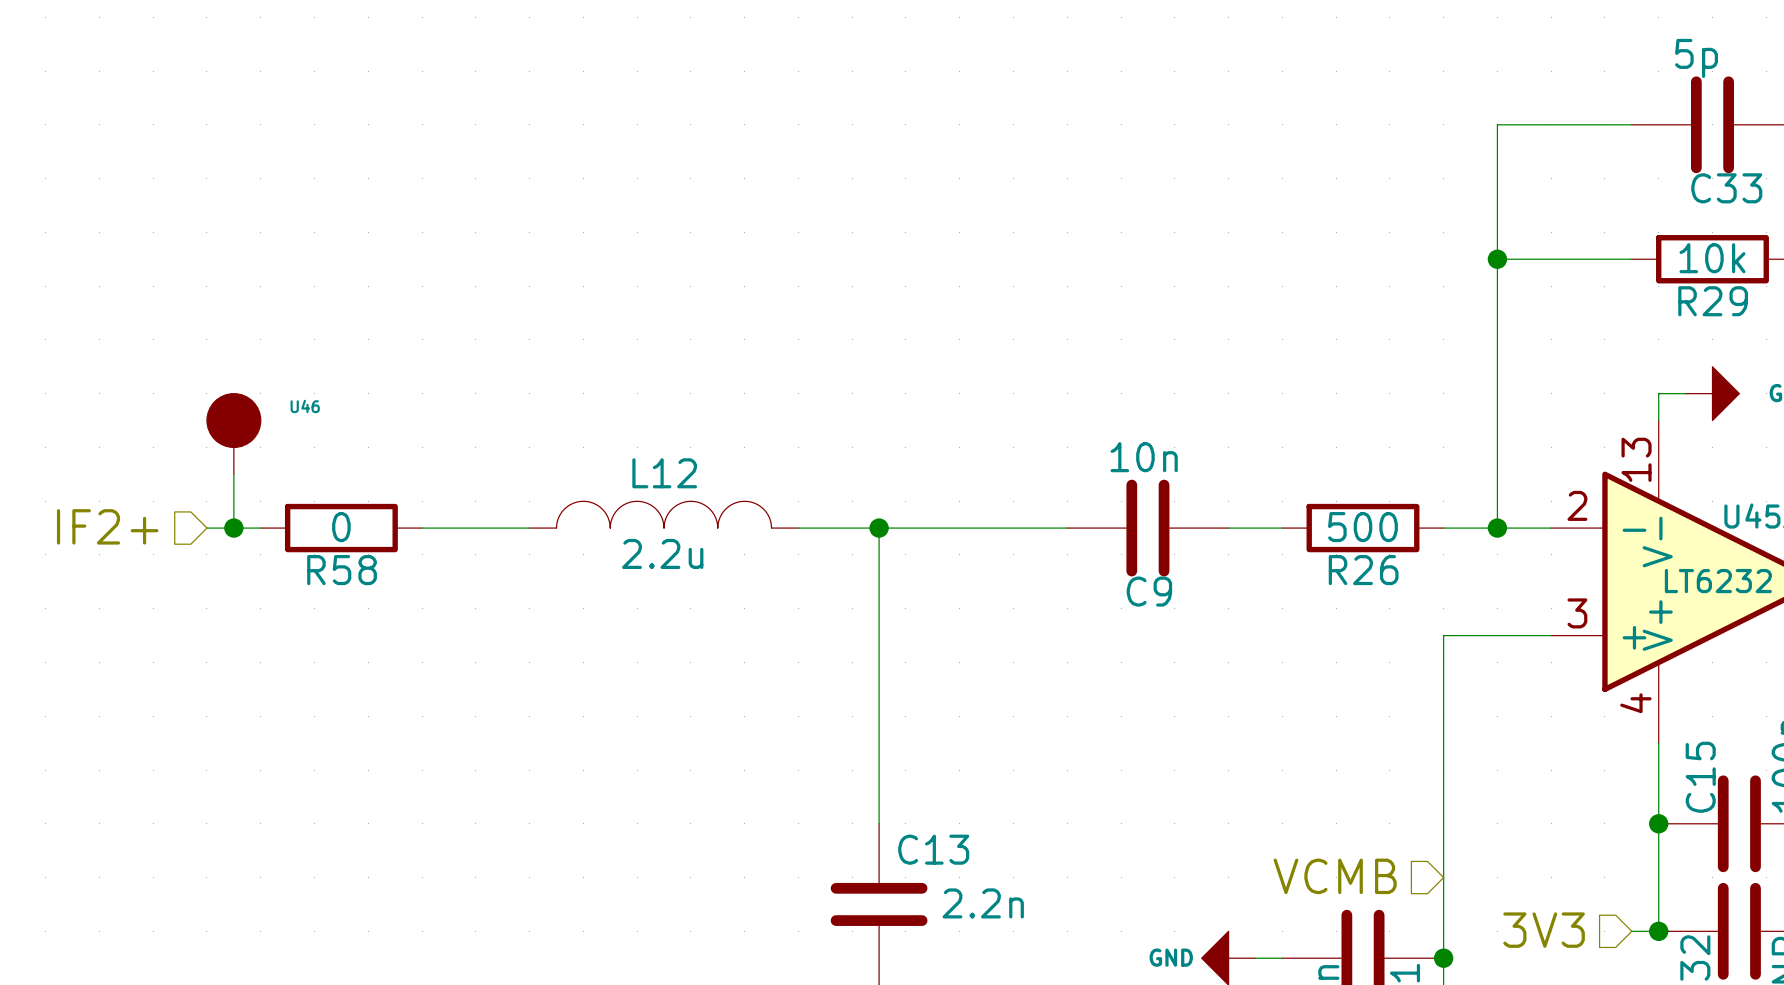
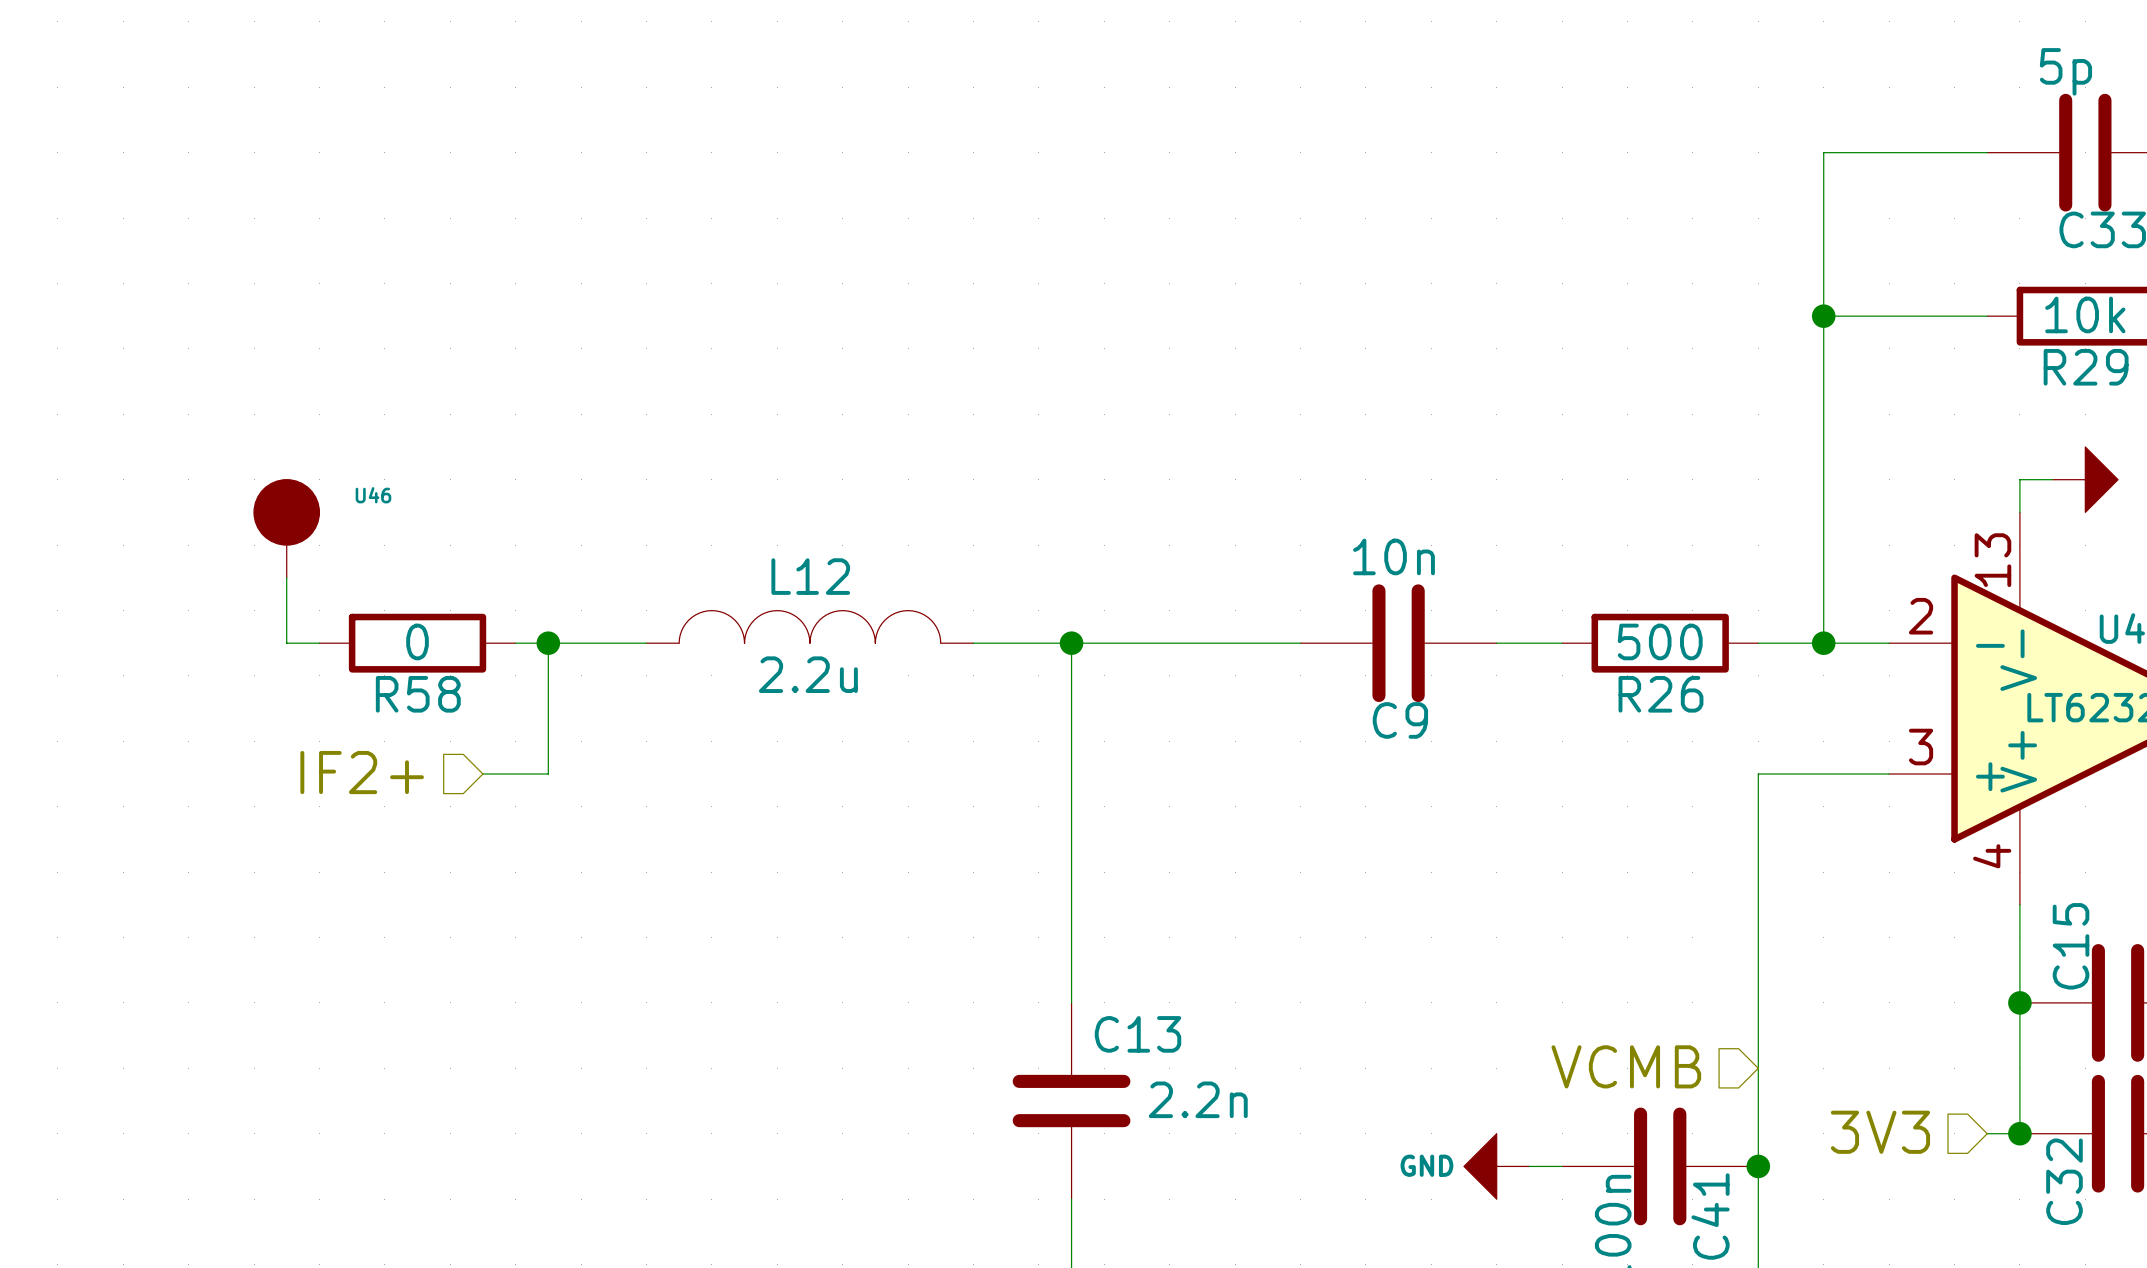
hierarchical label position: IF2+ (107, 526) -> IF2+ (362, 772)
wire: (206, 528) (233, 528) -> none
junction: (233, 528) -> none
wire: none -> (548, 643) (548, 774) (482, 774)
junction: none -> (548, 643)

